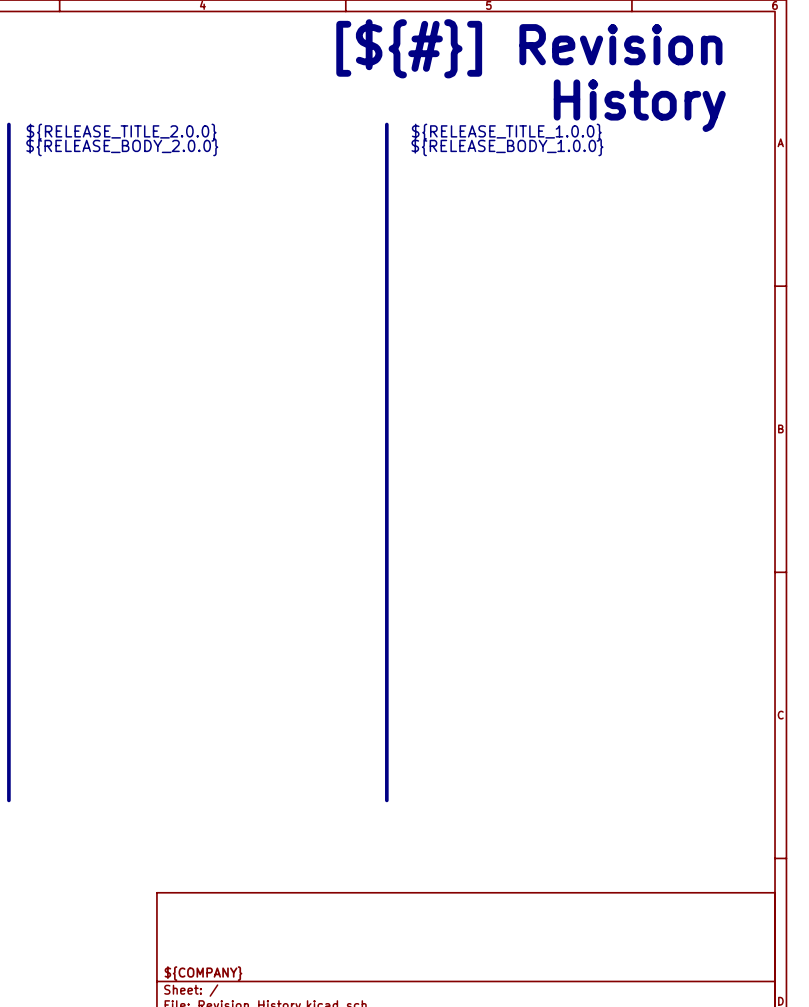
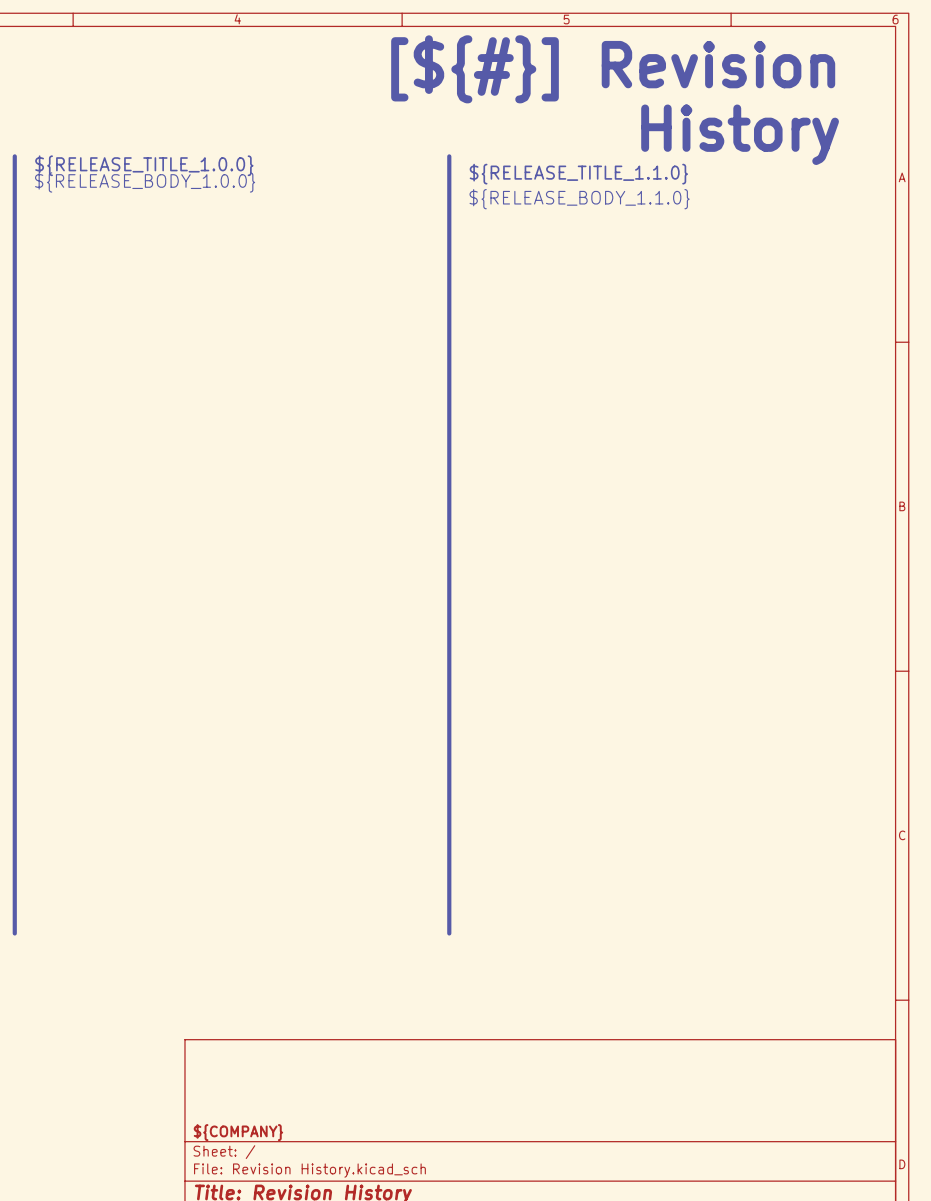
text: ${RELEASE_TITLE_2.0.0} (121, 132) -> ${RELEASE_TITLE_1.0.0} (144, 165)
text: ${RELEASE_TITLE_1.0.0} (506, 132) -> none
text: none -> ${RELEASE_TITLE_1.1.0} (578, 174)
text: ${RELEASE_BODY_2.0.0} (122, 147) -> ${RELEASE_BODY_1.0.0} (145, 182)
text: ${RELEASE_BODY_1.0.0} (507, 147) -> none
text: none -> ${RELEASE_BODY_1.1.0} (579, 199)

